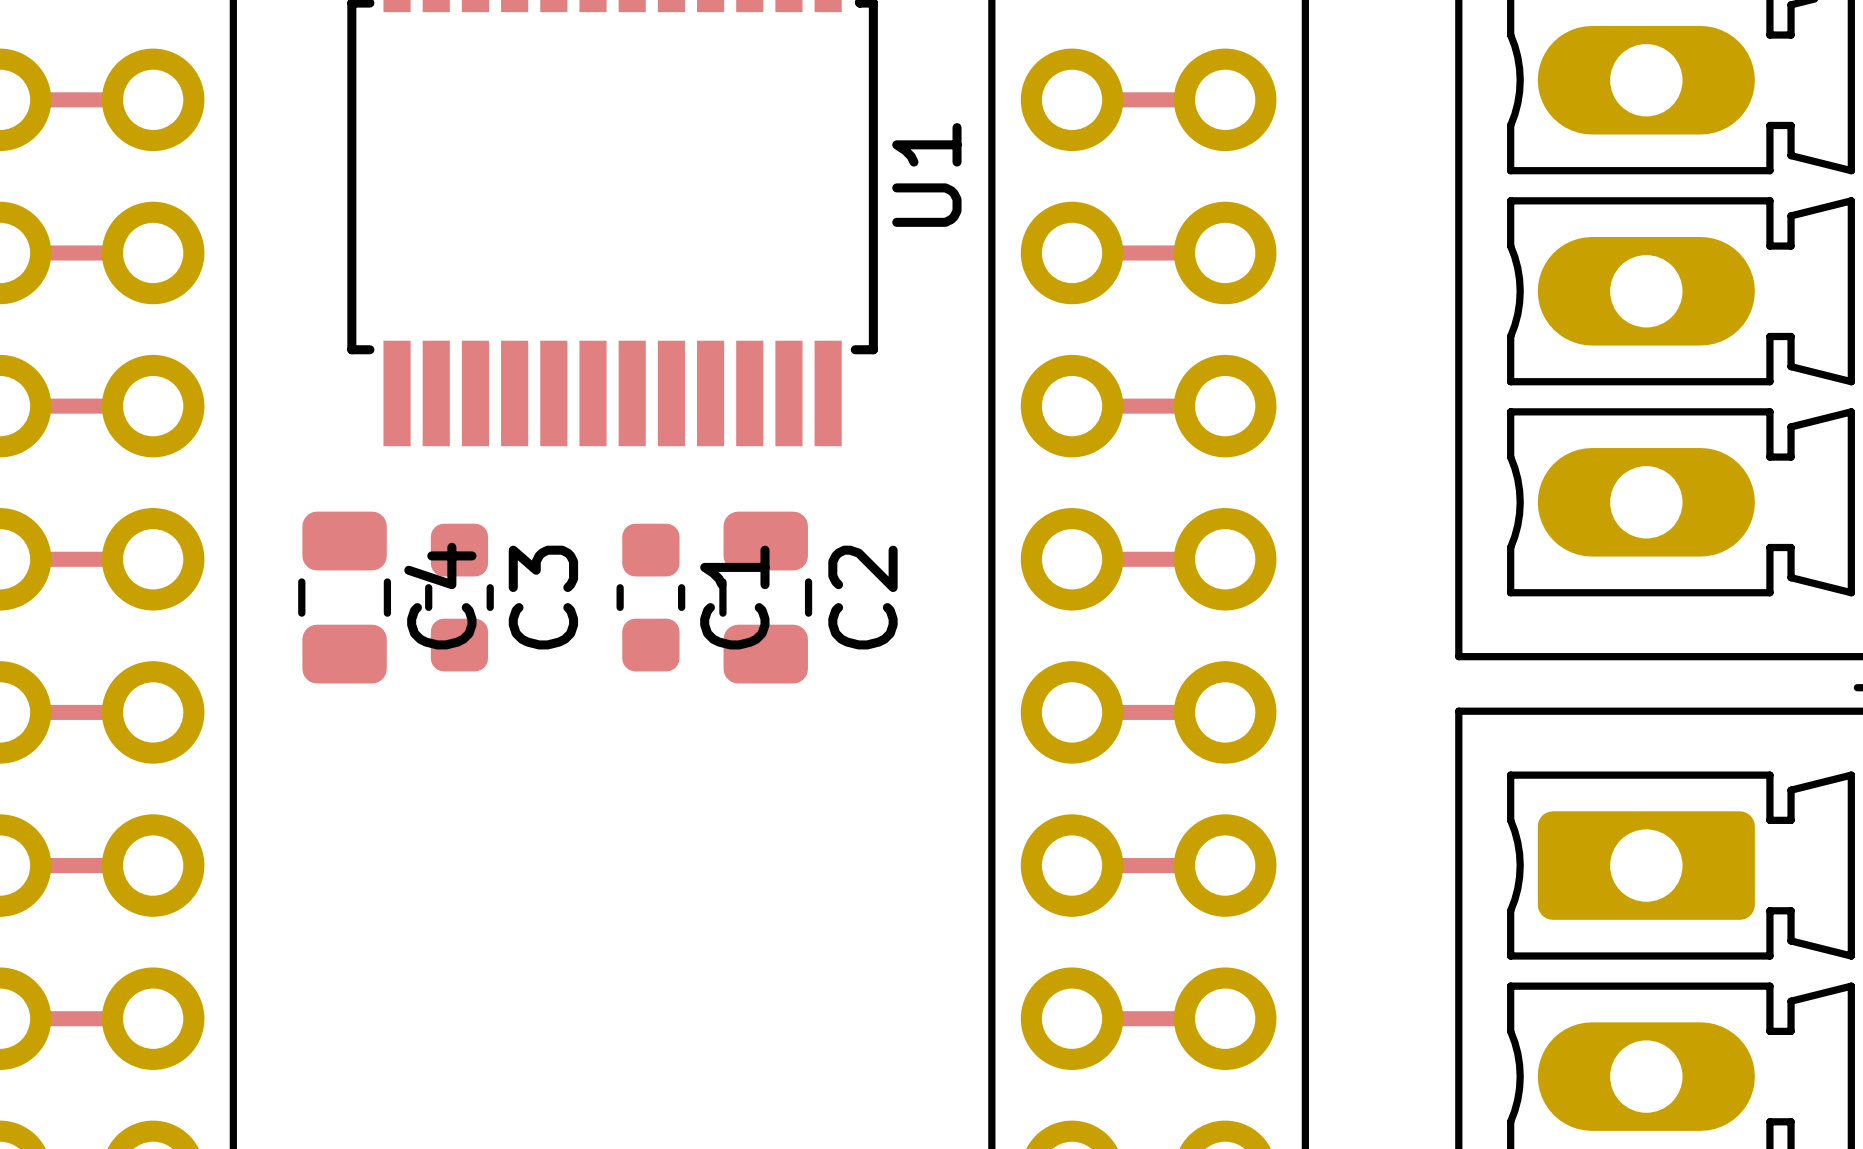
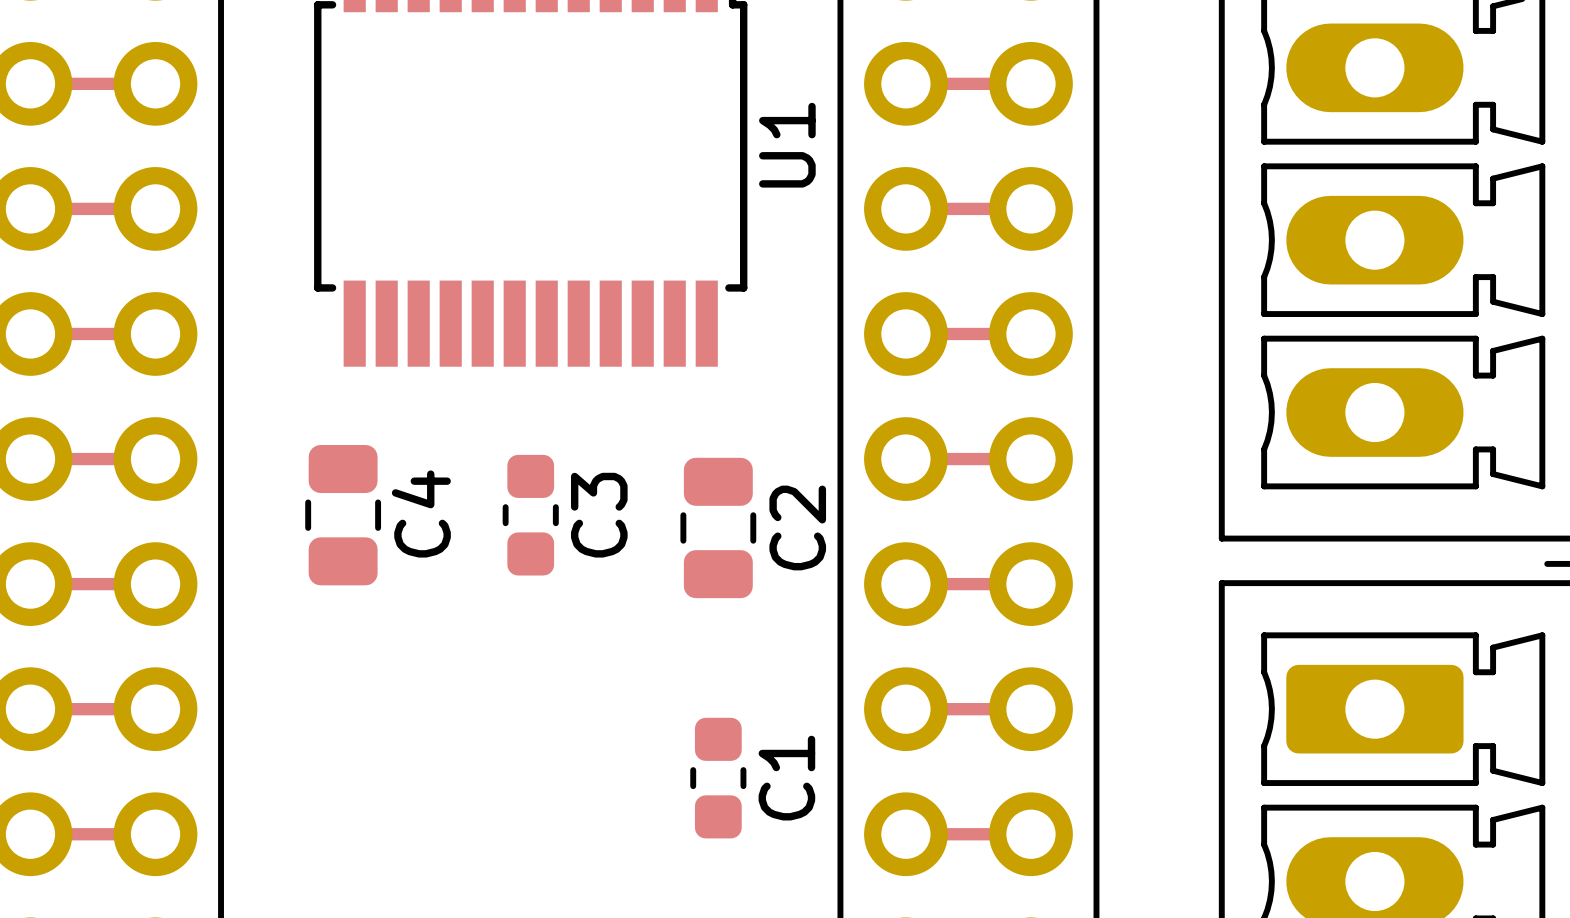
C4 position: (344, 597) -> (343, 515)
C3 position: (459, 597) -> (530, 515)
C1 position: (650, 597) -> (718, 778)
C2 position: (765, 597) -> (718, 527)

